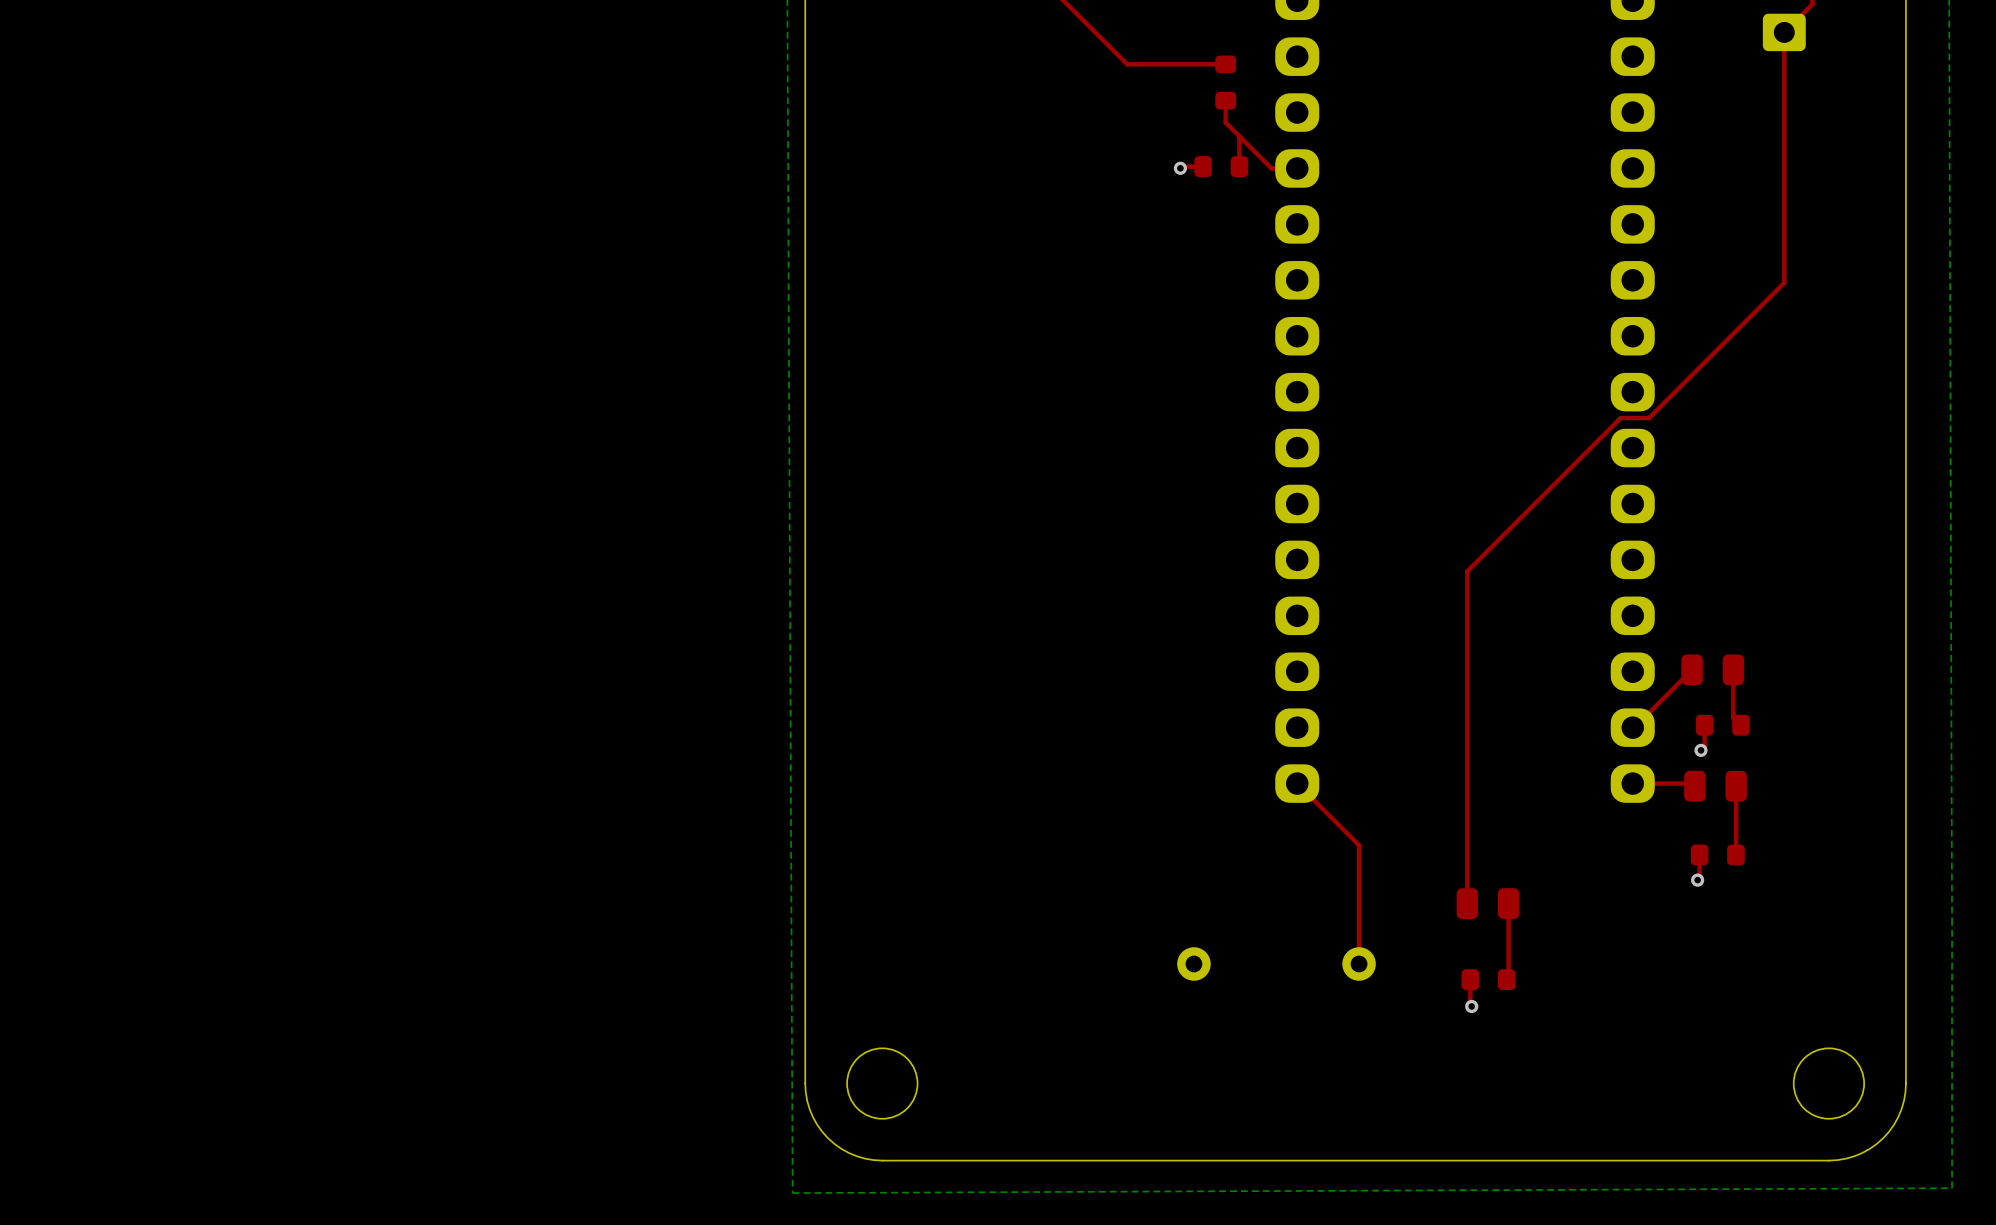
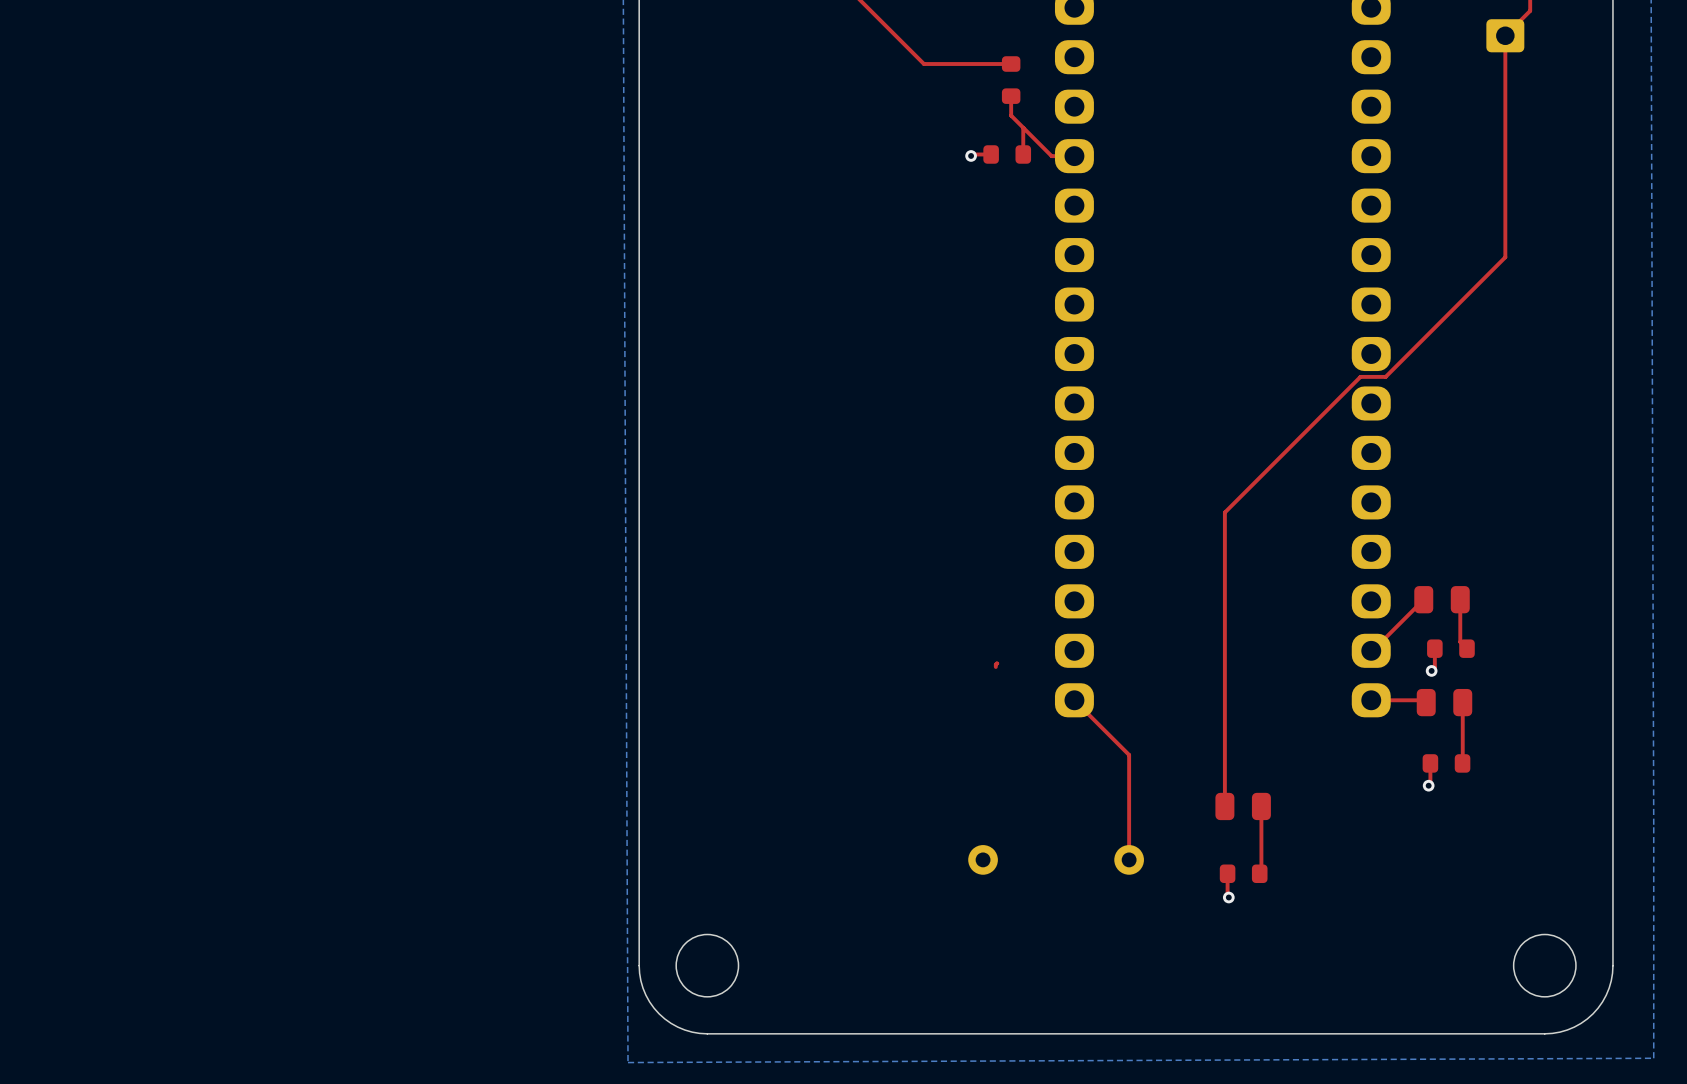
top track: none -> (997, 663) (995, 666)

